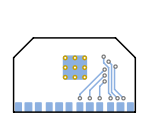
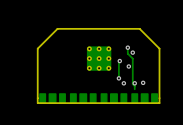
track: (108, 61) (111, 64) (111, 92) (117, 98) -> none
track: (115, 66) (114, 89) (123, 98) -> none
via: (115, 66) -> none
track: (104, 69) (79, 94) (79, 98) -> none
via: (104, 69) -> none
track: none -> (119, 61) (118, 78)
via: none -> (119, 61)
track: (104, 75) (89, 90) (89, 98) -> none
track: (104, 81) (99, 86) (99, 98) -> none
via: (104, 81) -> none
via: none -> (118, 78)
via: none -> (143, 82)
via: none -> (123, 83)
via: none -> (134, 83)
via: (79, 98) -> none
via: (89, 98) -> none
via: (99, 98) -> none
via: (110, 98) -> none
via: (117, 98) -> none
via: (123, 98) -> none

